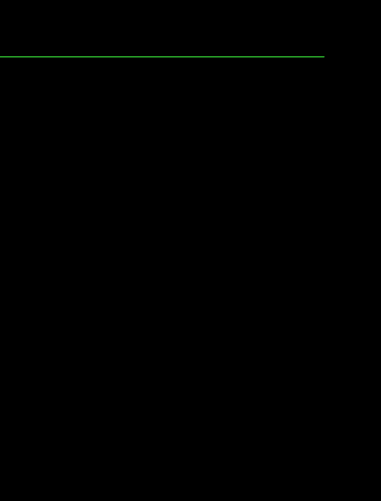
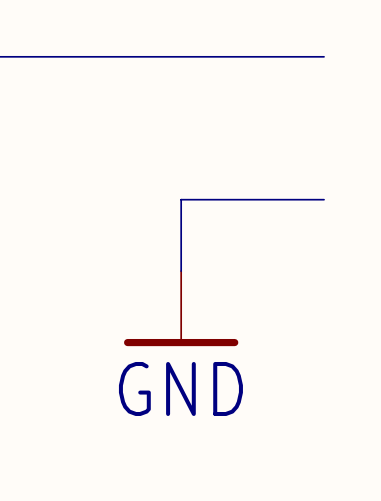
wire: none -> (324, 199) (181, 199) (181, 271)
power symbol: none -> GND (181, 308)

